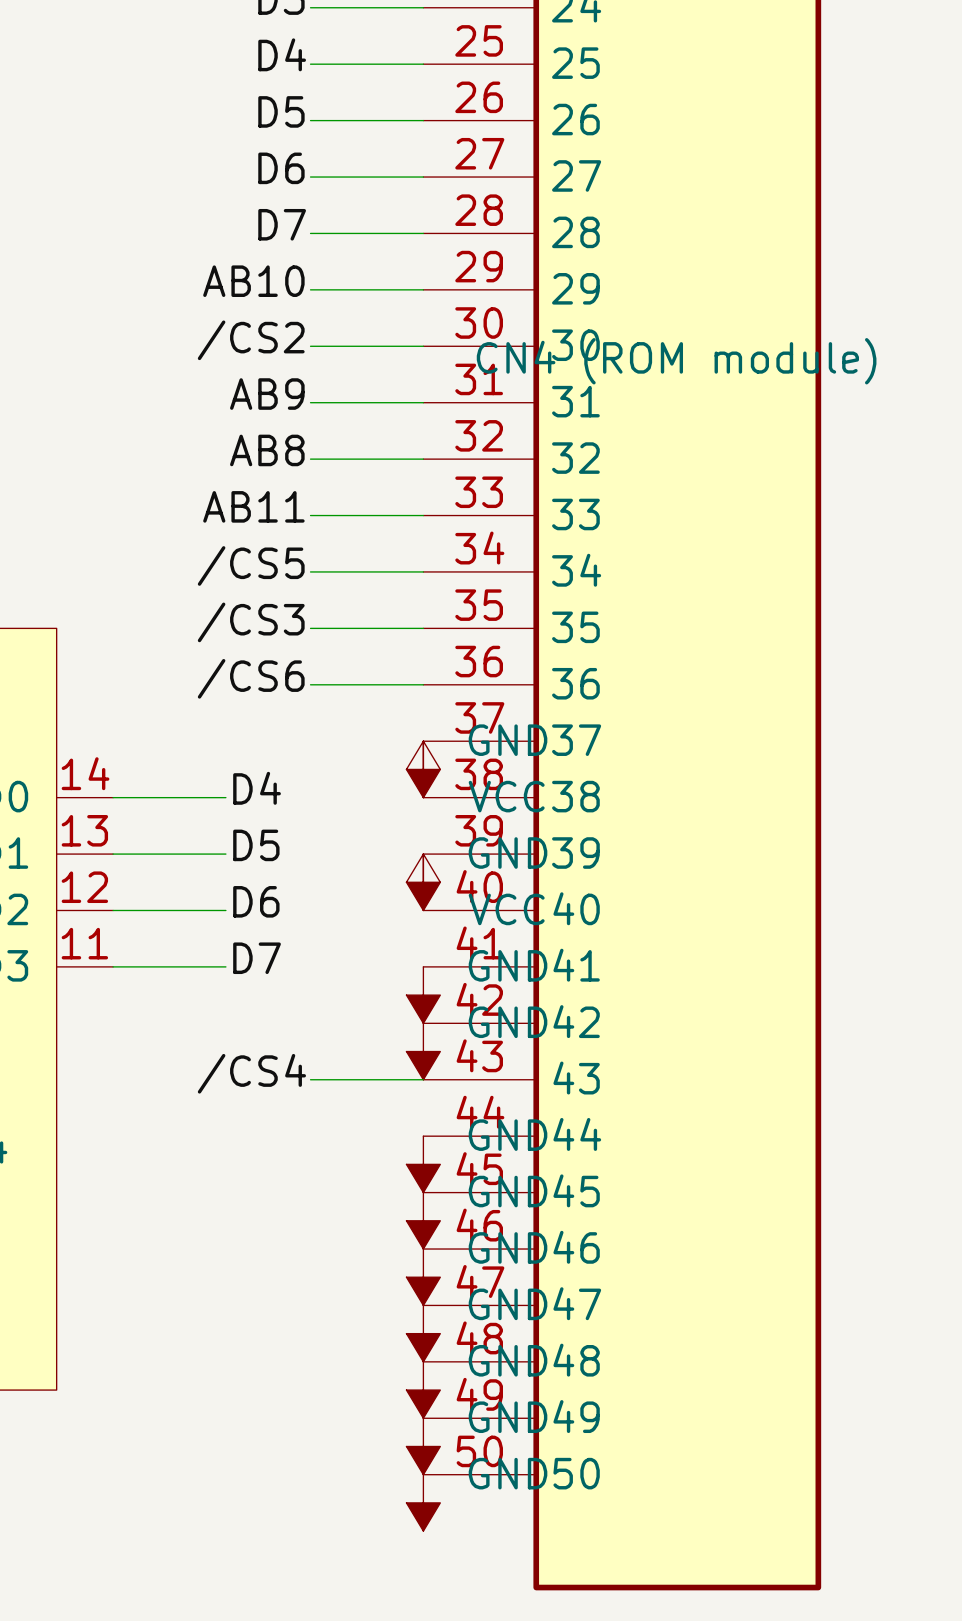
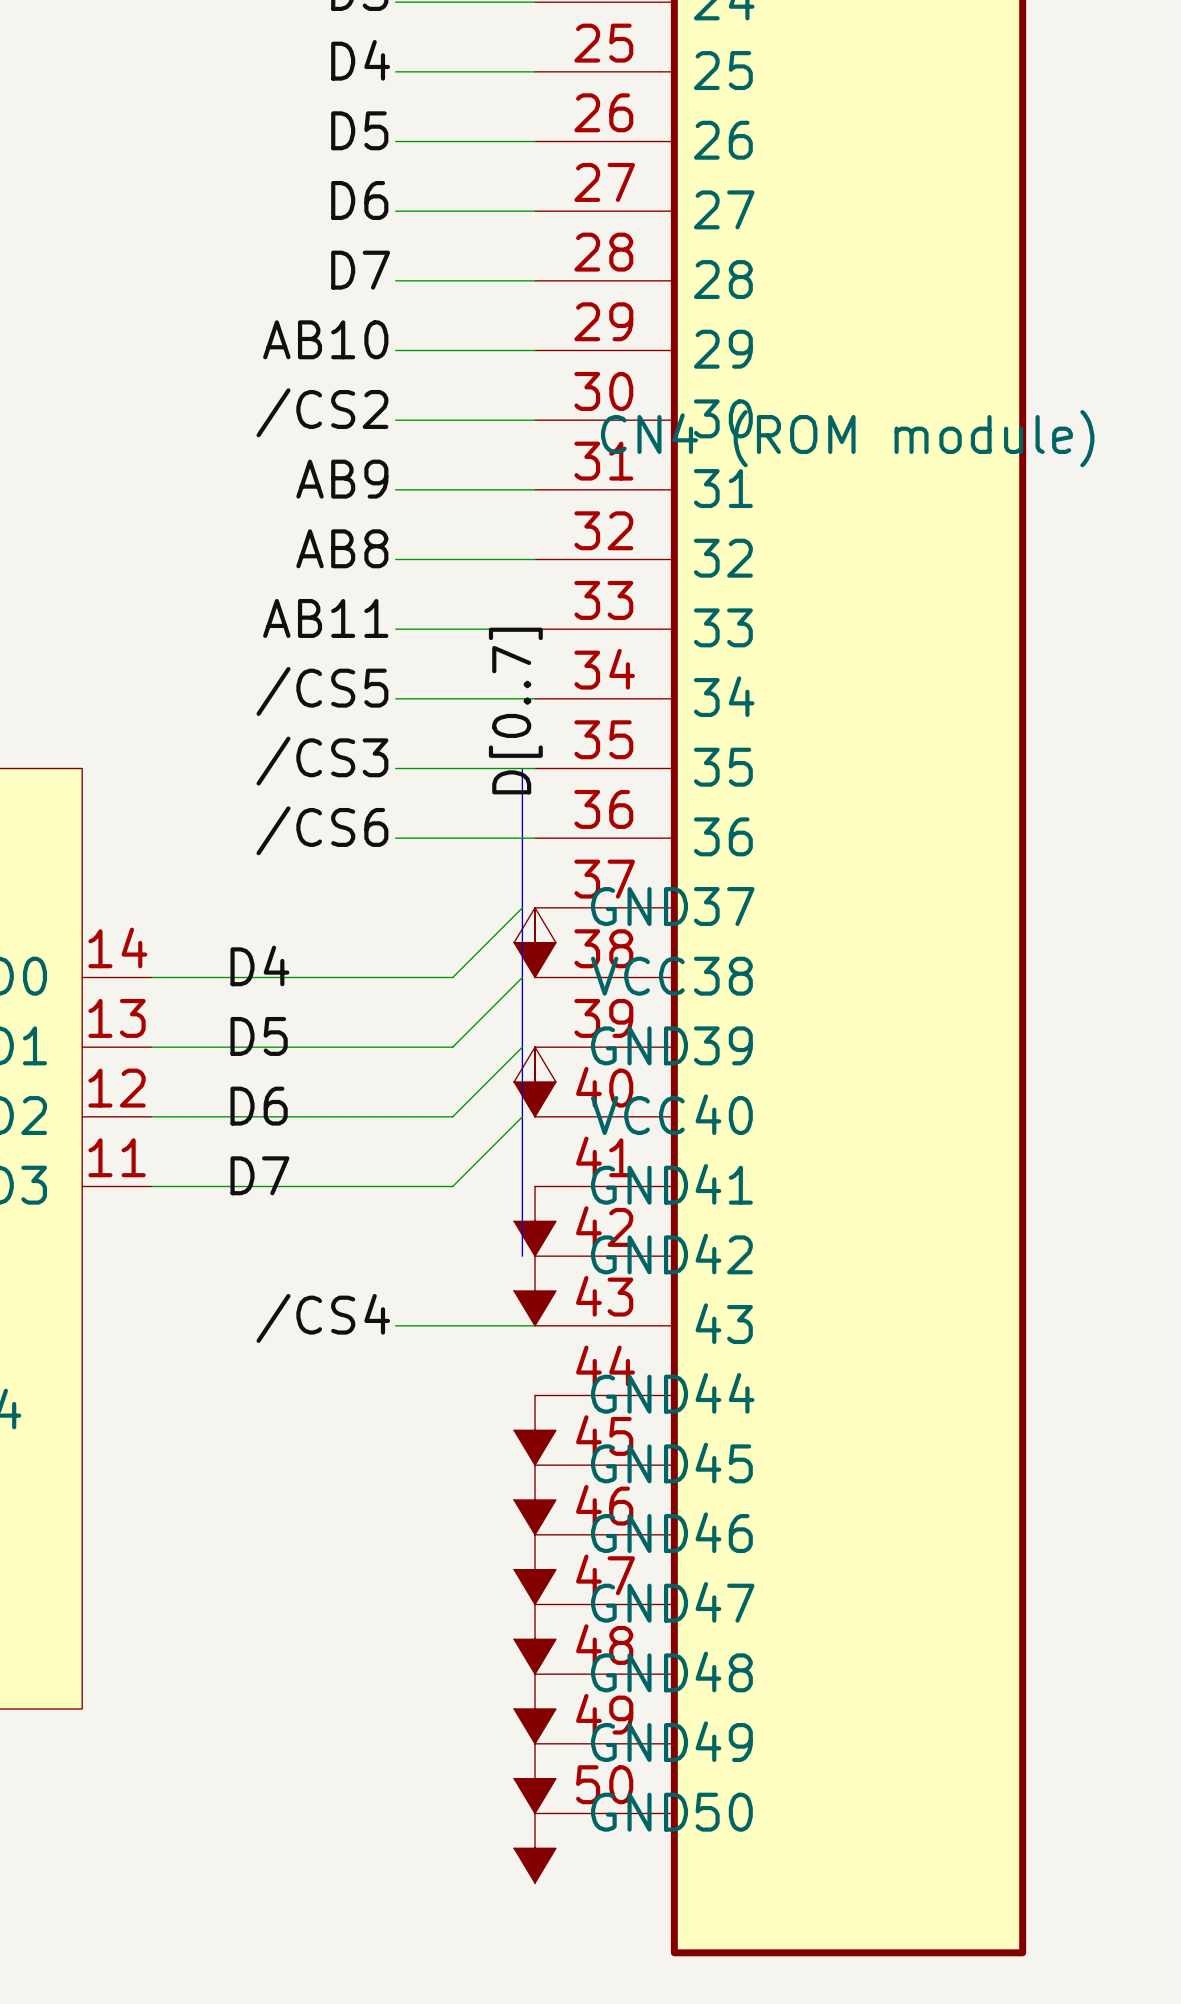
label: none -> D[0..7] (515, 711)
bus: none -> (522, 768) (522, 1256)
wire: none -> (522, 907) (452, 977) (291, 977)
label position: D4 (257, 788) -> D4 (259, 965)
wire: none -> (522, 977) (452, 1047) (291, 1047)
label position: D5 (256, 845) -> D5 (259, 1036)
wire: none -> (522, 1047) (452, 1116) (291, 1116)
label position: D6 (256, 901) -> D6 (259, 1106)
wire: none -> (522, 1116) (452, 1186) (291, 1186)
label position: D7 (257, 958) -> D7 (259, 1175)

